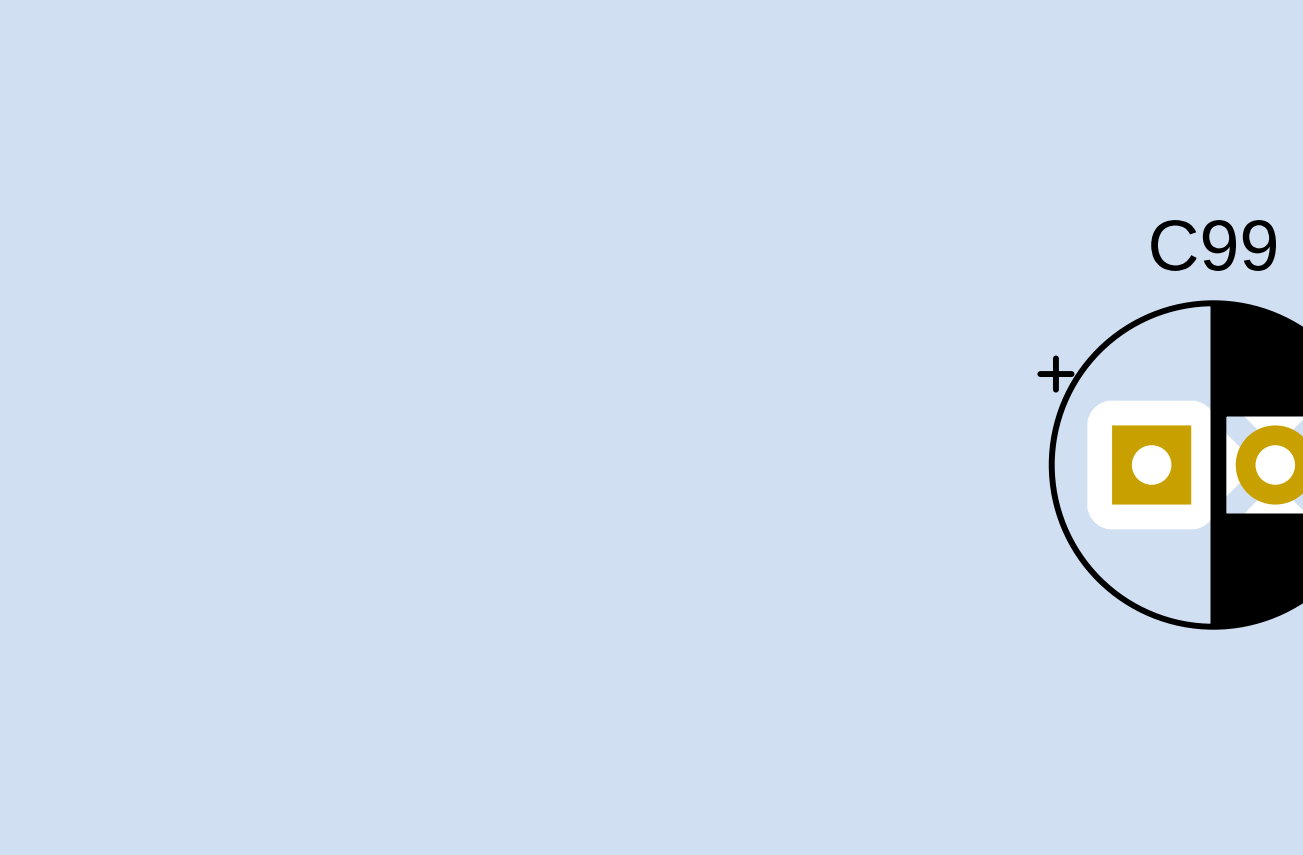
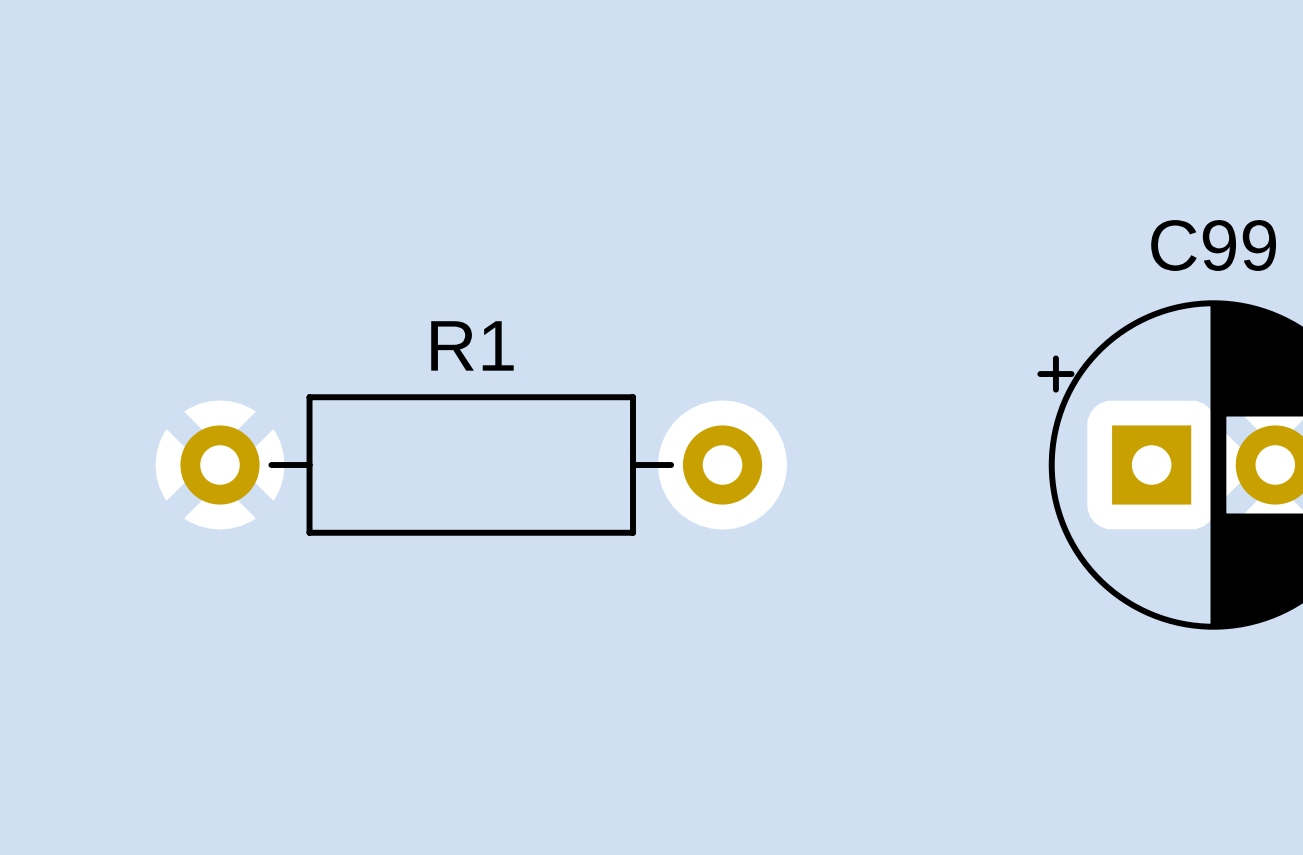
R1: none -> (471, 465)

